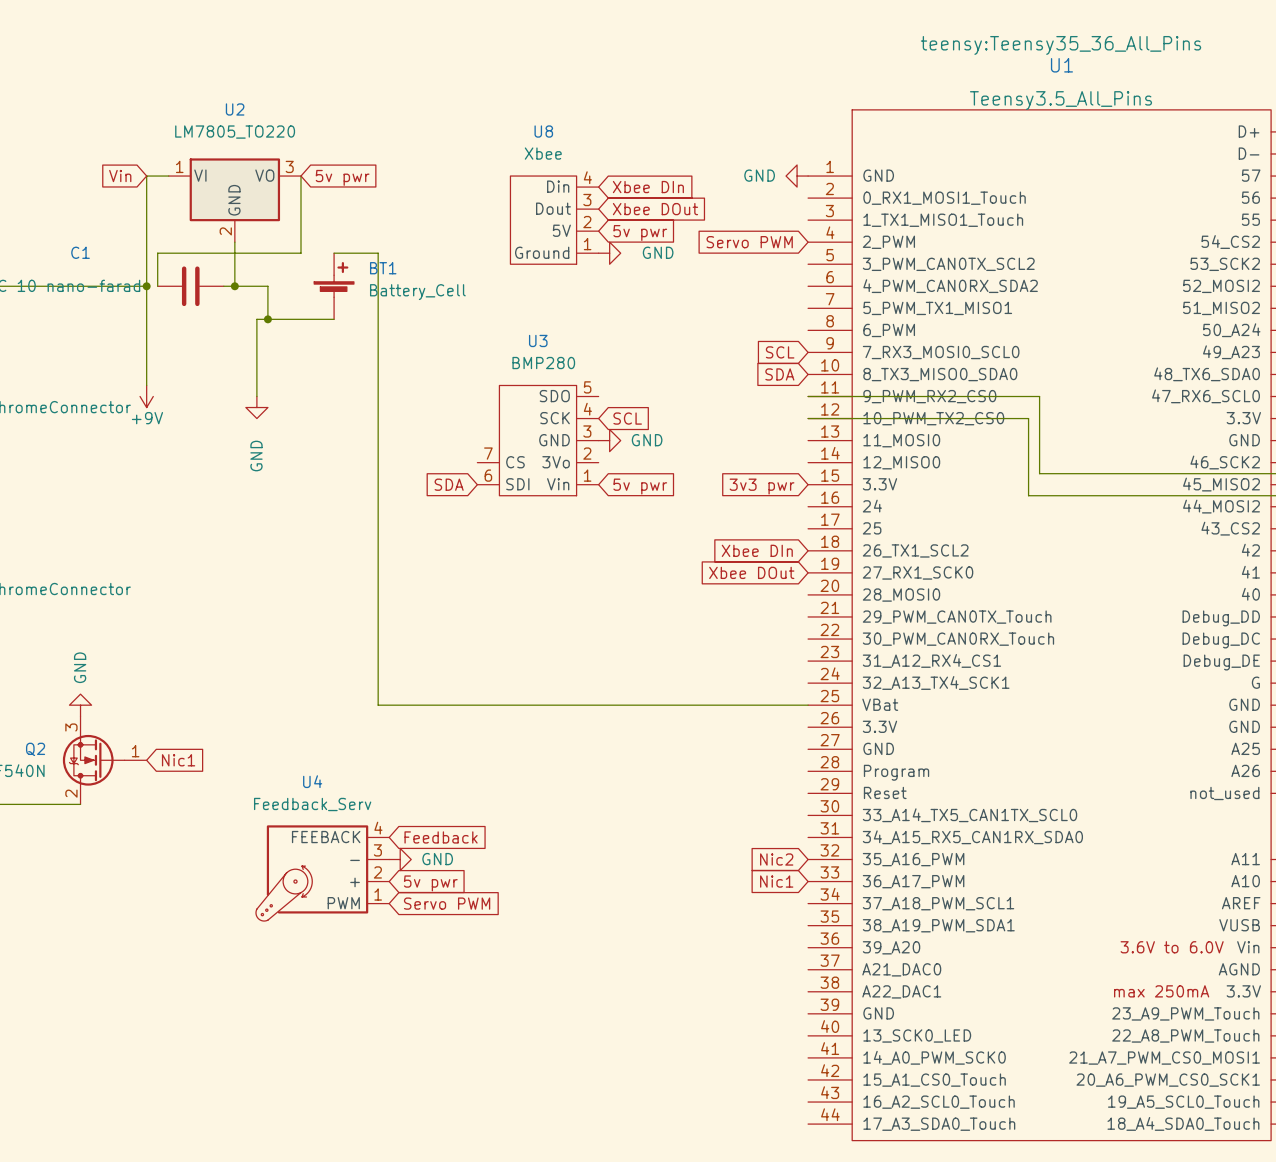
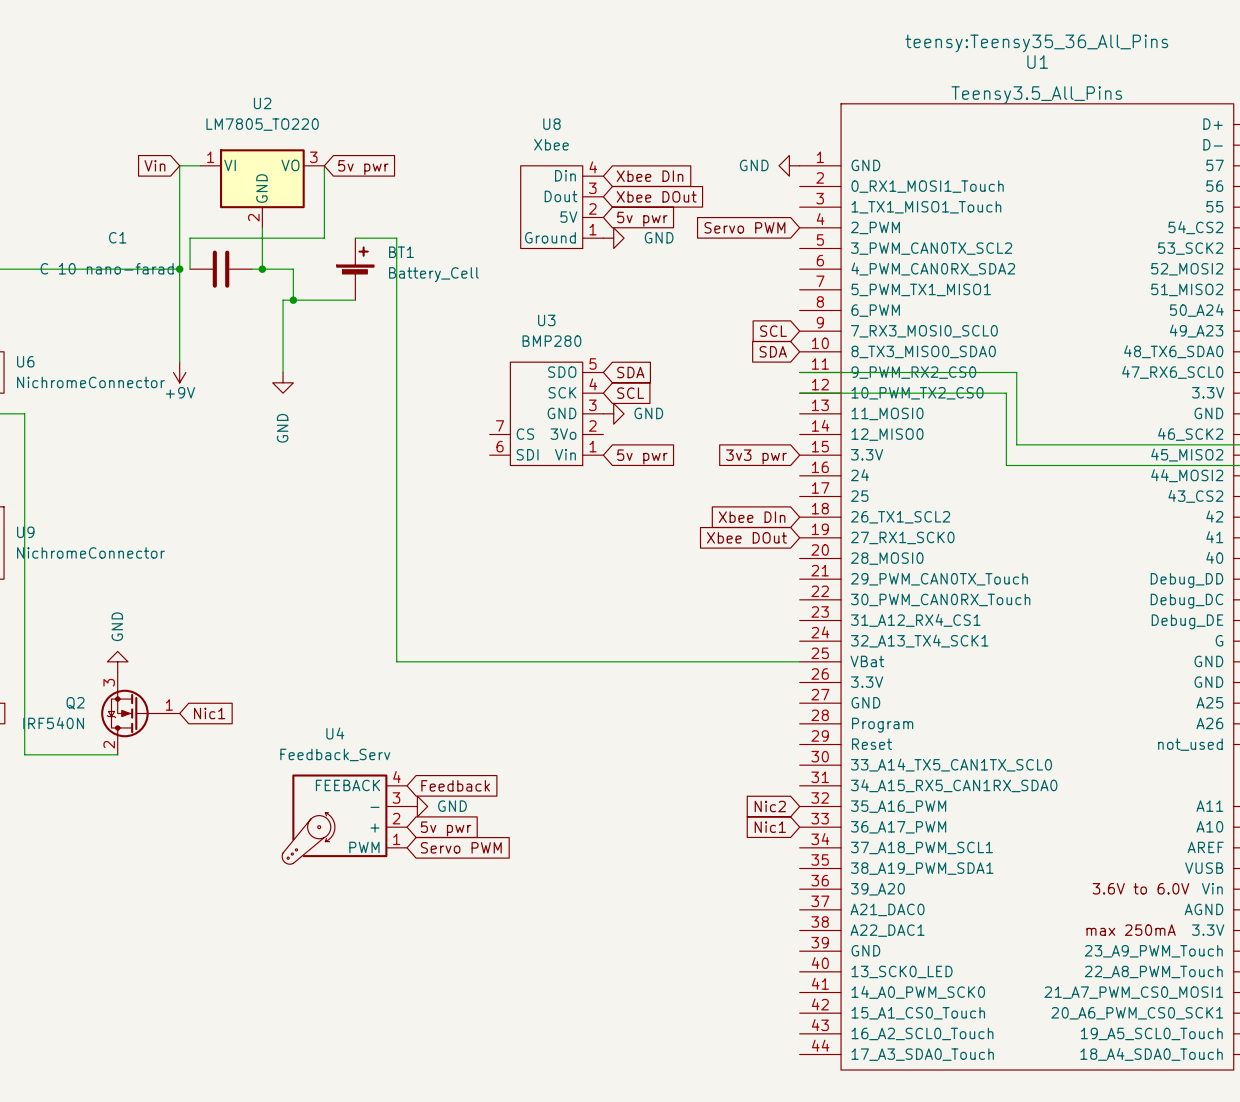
global label rotation: 0° (449, 484) -> 180° (630, 372)
global label position: SDA (449, 484) -> SDA (630, 372)

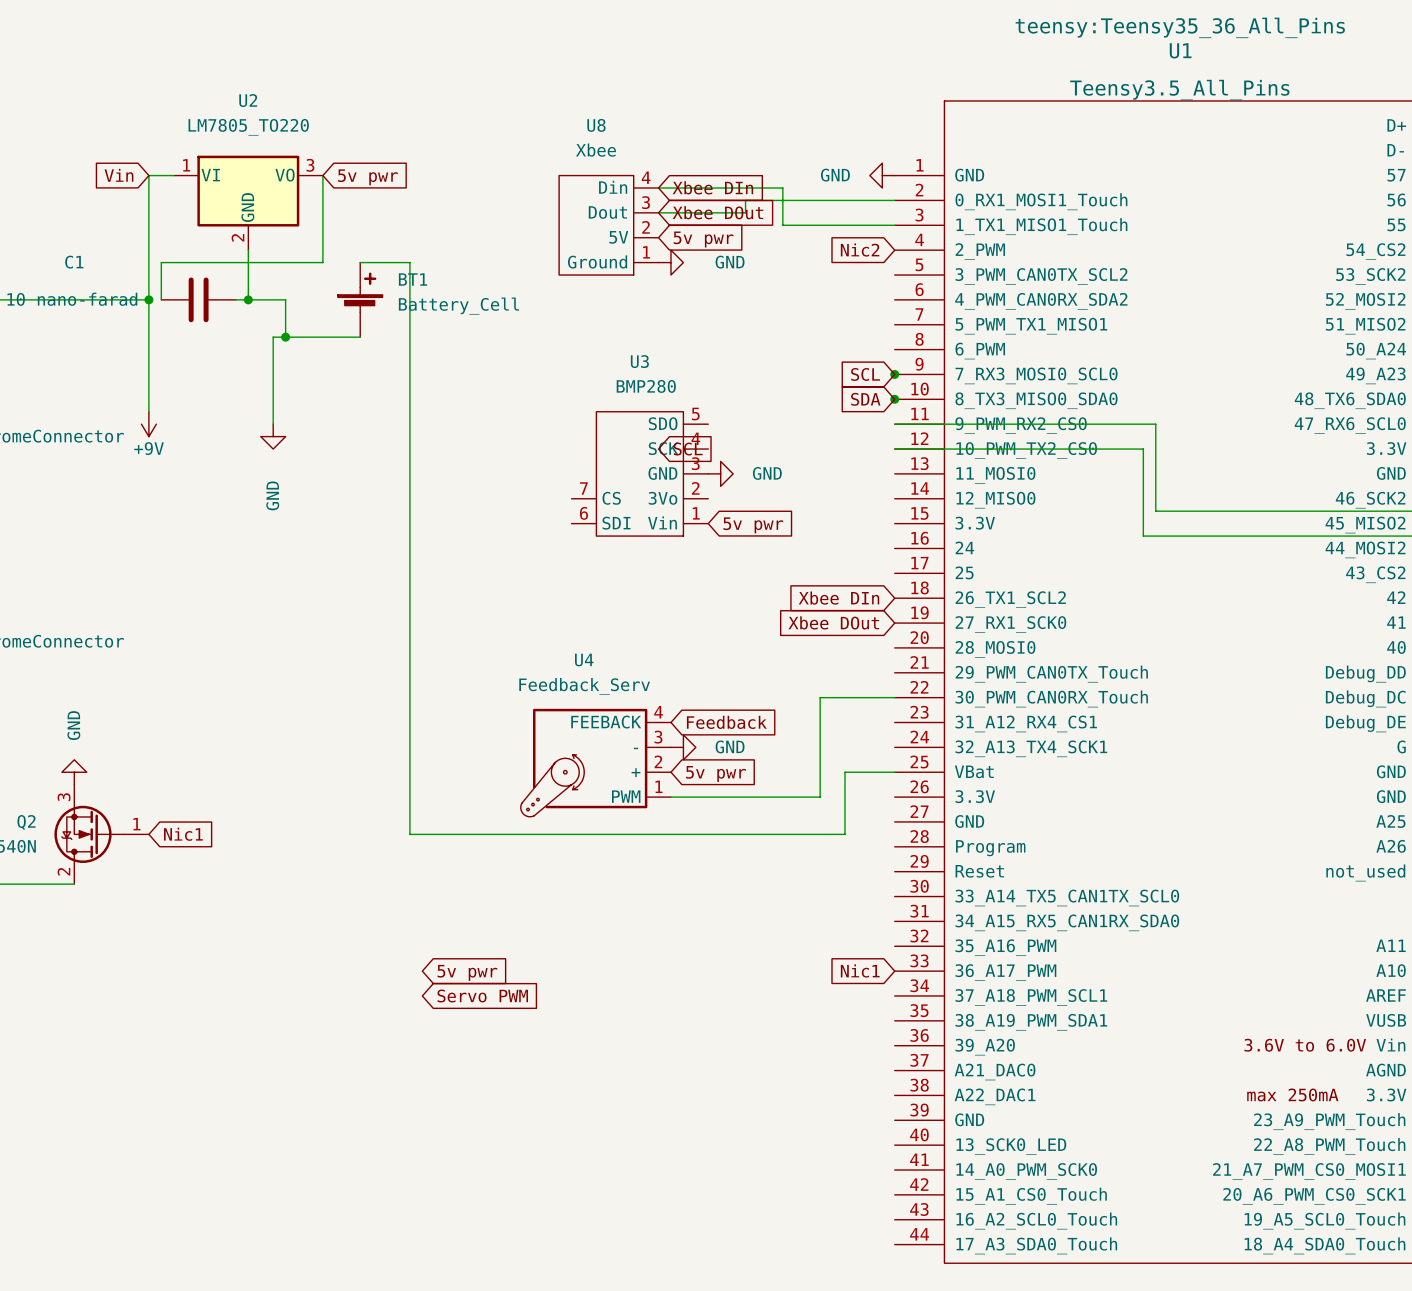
wire: none -> (658, 188) (782, 188) (782, 225) (894, 225)
wire: none -> (894, 200) (745, 200) (745, 212) (658, 212)
global label: Servo PWM (744, 227) -> Nic2 (860, 250)
junction: none -> (894, 374)
junction: none -> (894, 399)
global label: SDA (630, 372) -> none
U3 position: (546, 413) -> (639, 473)
power symbol position: GND (613, 413) -> GND (720, 473)
global label position: 5v pwr (642, 456) -> 5v pwr (753, 525)
global label: 3v3 pwr (756, 456) -> none
wire: none -> (894, 697) (820, 697) (820, 797) (670, 797)
global label: none -> Feedback (726, 722)
power symbol: none -> GND (683, 747)
wire: (396, 661) (758, 661) -> (409, 772) (409, 834) (845, 834) (845, 772)
global label: none -> 5v pwr (716, 774)
global label: Feedback (455, 785) -> none
power symbol: GND (417, 806) -> none
global label: Nic2 (770, 806) -> none
U4 position: (344, 819) -> (595, 762)

